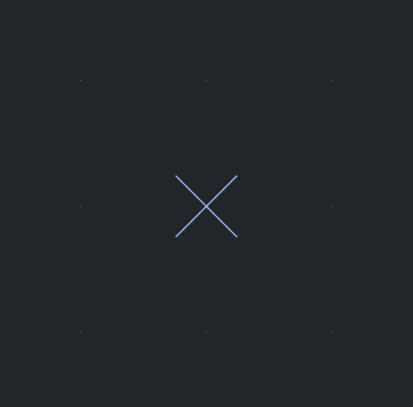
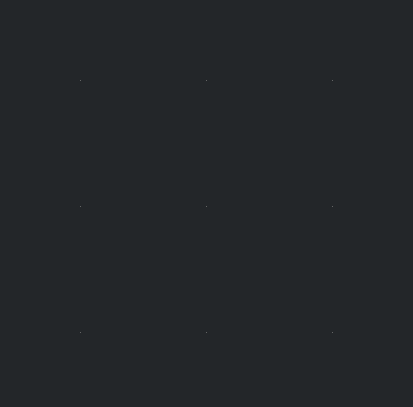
no-connect mark: (206, 206) -> none

